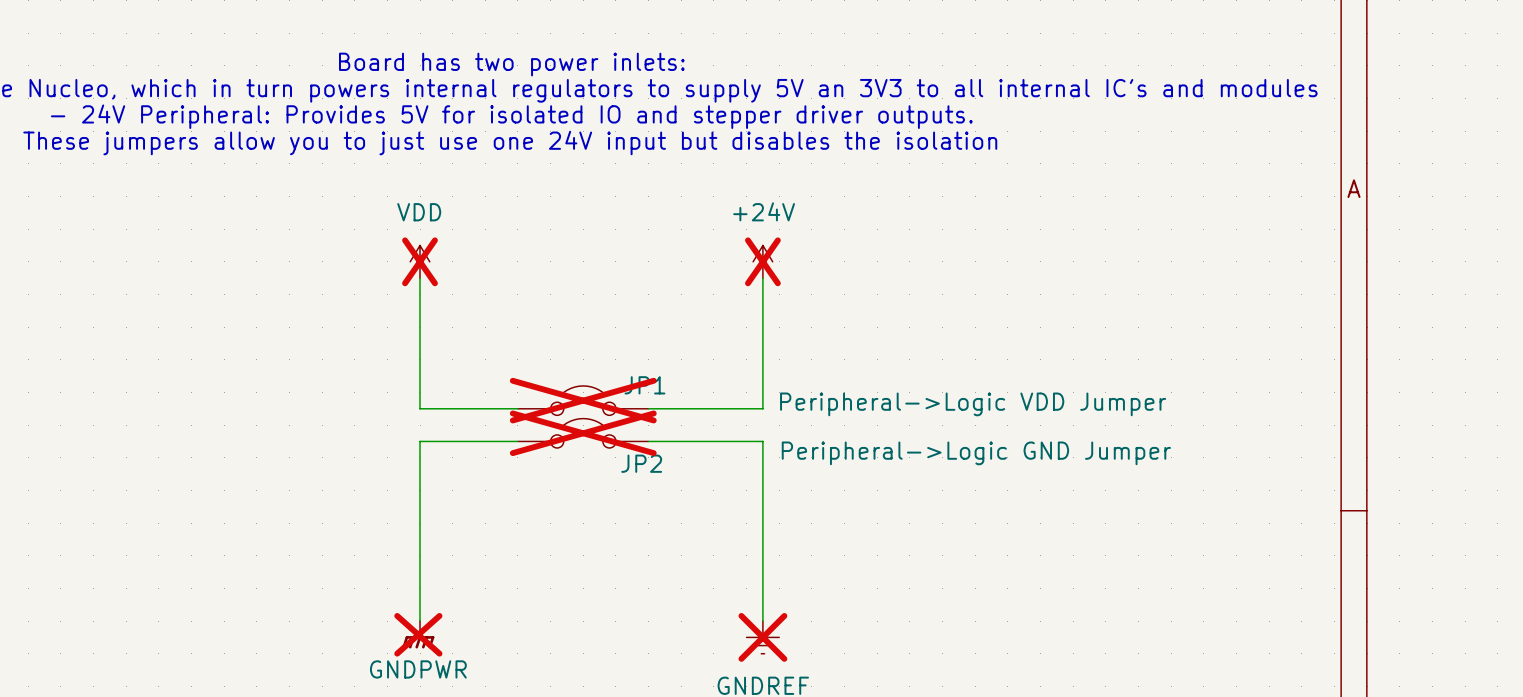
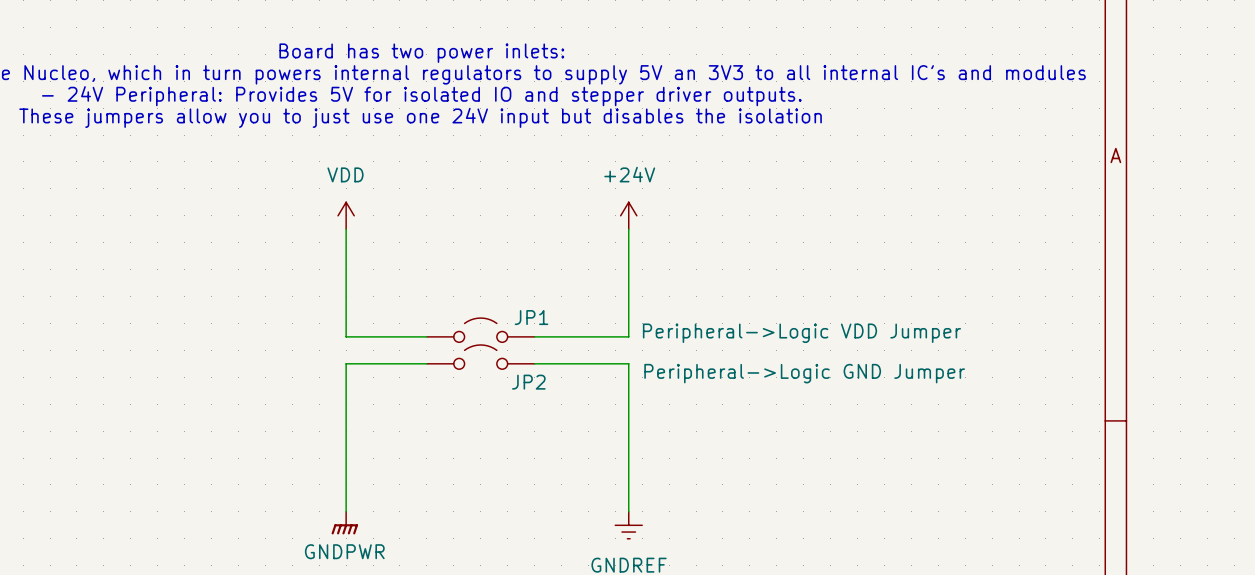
power symbol do-not-place cross: (420, 261) -> none
power symbol do-not-place cross: (762, 261) -> none
JP1 do-not-place cross: (583, 400) -> none
JP2 do-not-place cross: (583, 433) -> none
power symbol do-not-place cross: (418, 634) -> none
power symbol do-not-place cross: (762, 637) -> none

